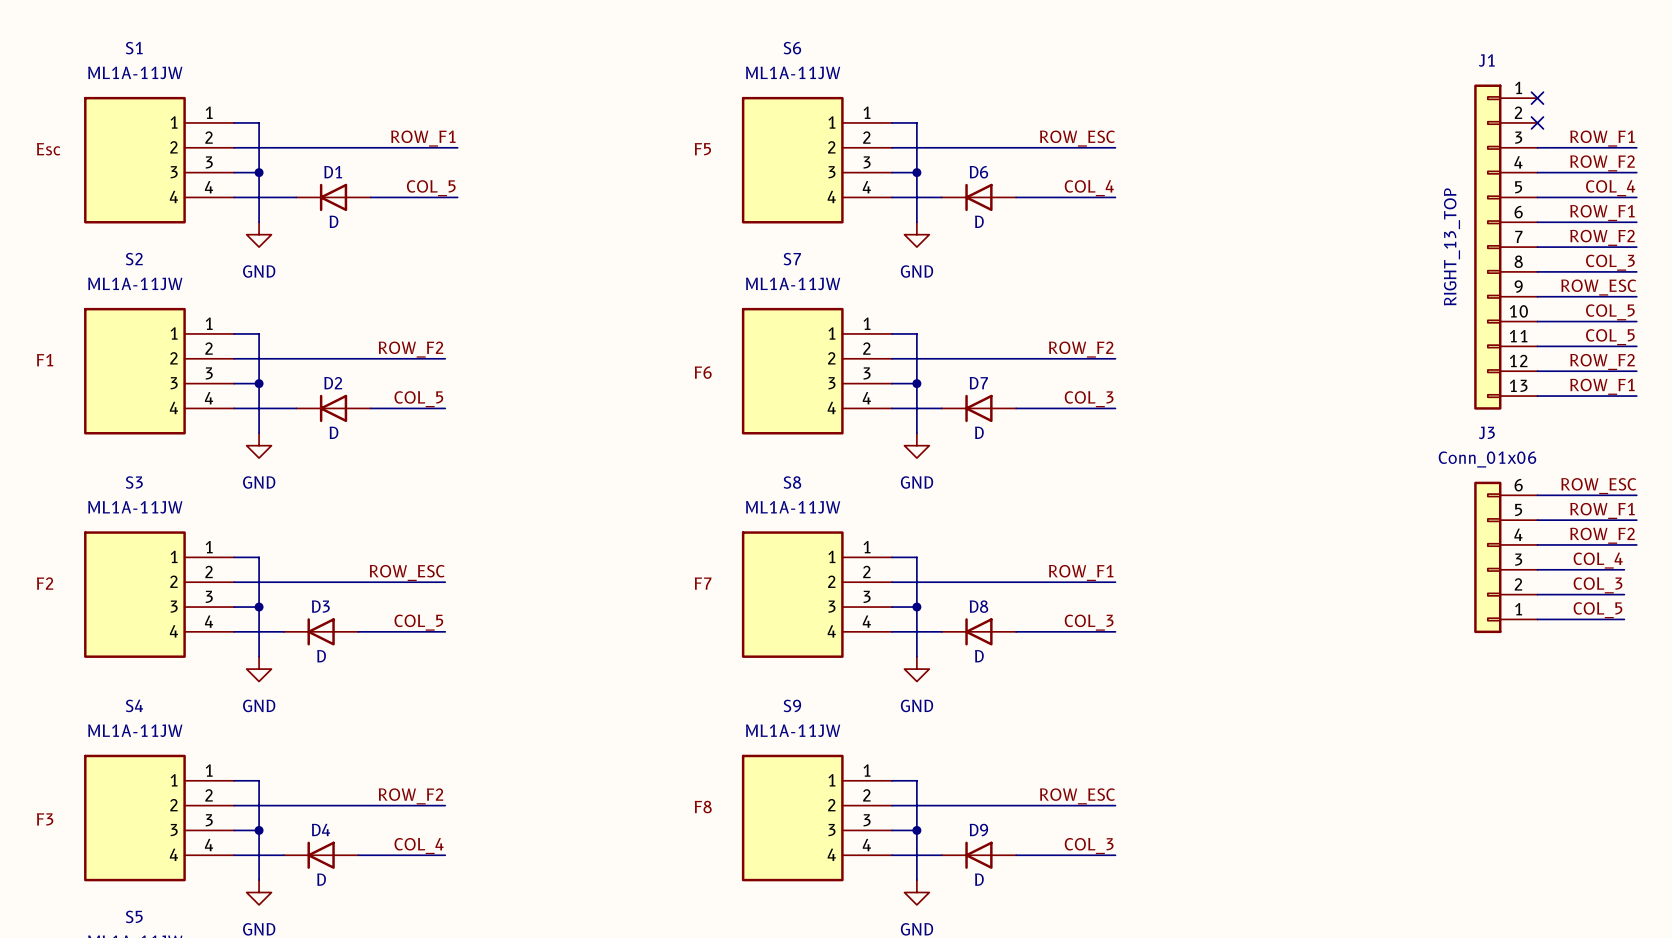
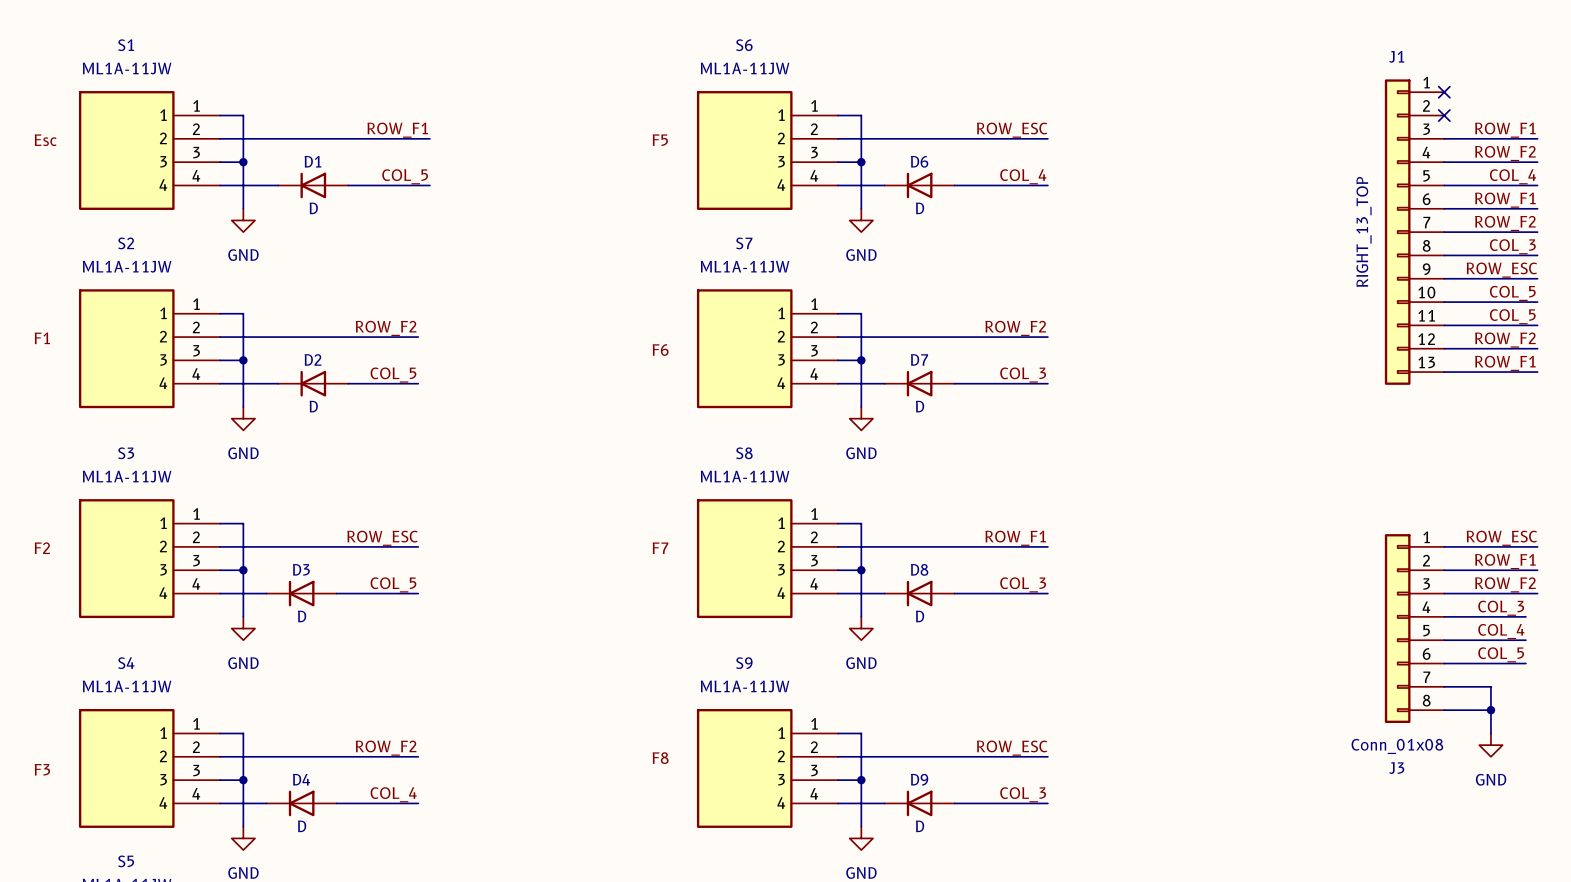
J3 name position: J3 (1486, 432) -> J3 (1396, 768)
J3 value: Conn_01x06 (1487, 459) -> Conn_01x08 (1397, 746)
J3 symbol: [1474, 481, 1538, 634] -> [1384, 534, 1445, 723]
label position: ROW_ESC (1598, 486) -> ROW_ESC (1501, 538)
wire: (1537, 495) (1636, 495) -> (1444, 546) (1537, 546)
label position: ROW_F1 (1602, 510) -> ROW_F1 (1505, 561)
wire: (1537, 520) (1636, 520) -> (1444, 570) (1537, 570)
label position: ROW_F2 (1602, 535) -> ROW_F2 (1505, 584)
wire: (1537, 544) (1636, 544) -> (1444, 593) (1537, 593)
label position: COL_4 (1598, 560) -> COL_4 (1501, 631)
wire: (1537, 569) (1624, 569) -> (1444, 616) (1525, 616)
label position: COL_3 (1598, 585) -> COL_3 (1501, 608)
wire: (1537, 594) (1624, 594) -> (1444, 640) (1525, 640)
label position: COL_5 (1597, 610) -> COL_5 (1501, 654)
wire: (1537, 619) (1624, 619) -> (1444, 663) (1525, 663)
wire: none -> (1444, 686) (1490, 686) (1490, 733)
wire: none -> (1444, 710) (1490, 710)
junction: none -> (1490, 710)
power symbol: none -> GND (1490, 745)

